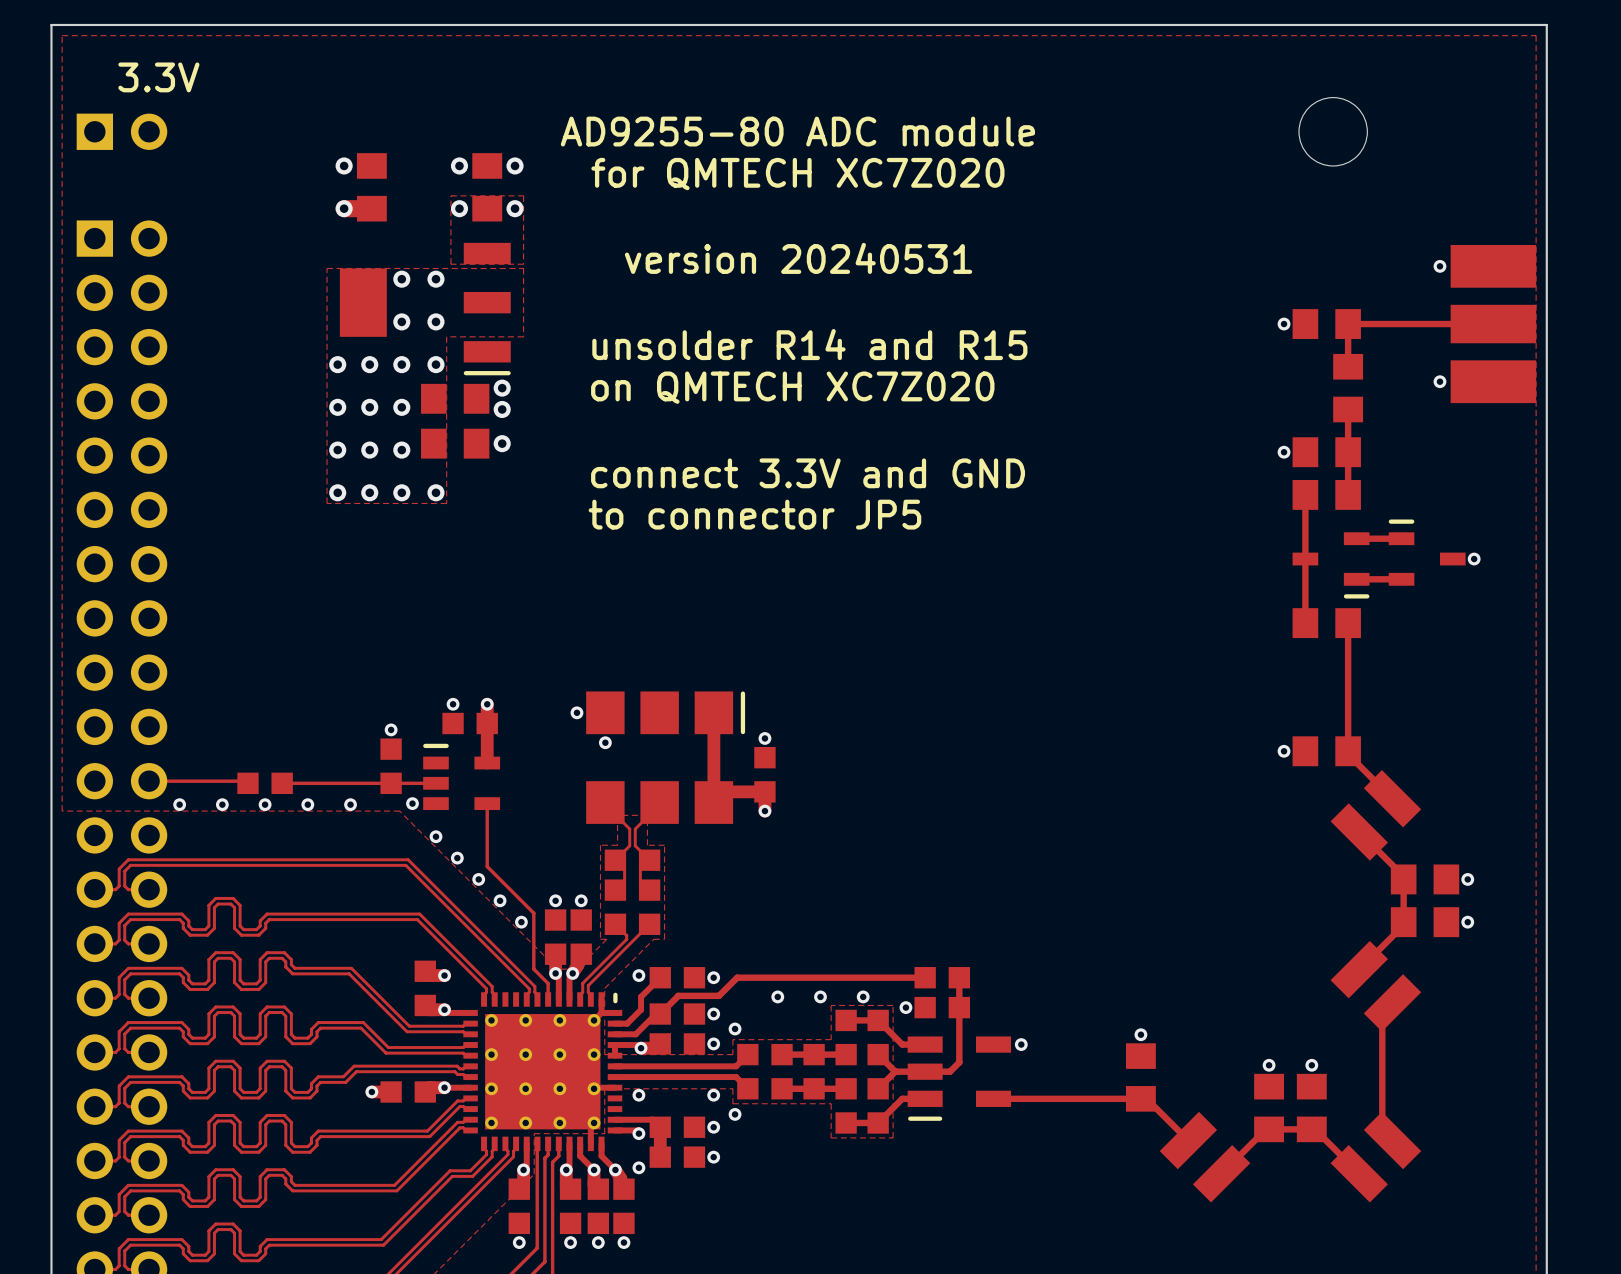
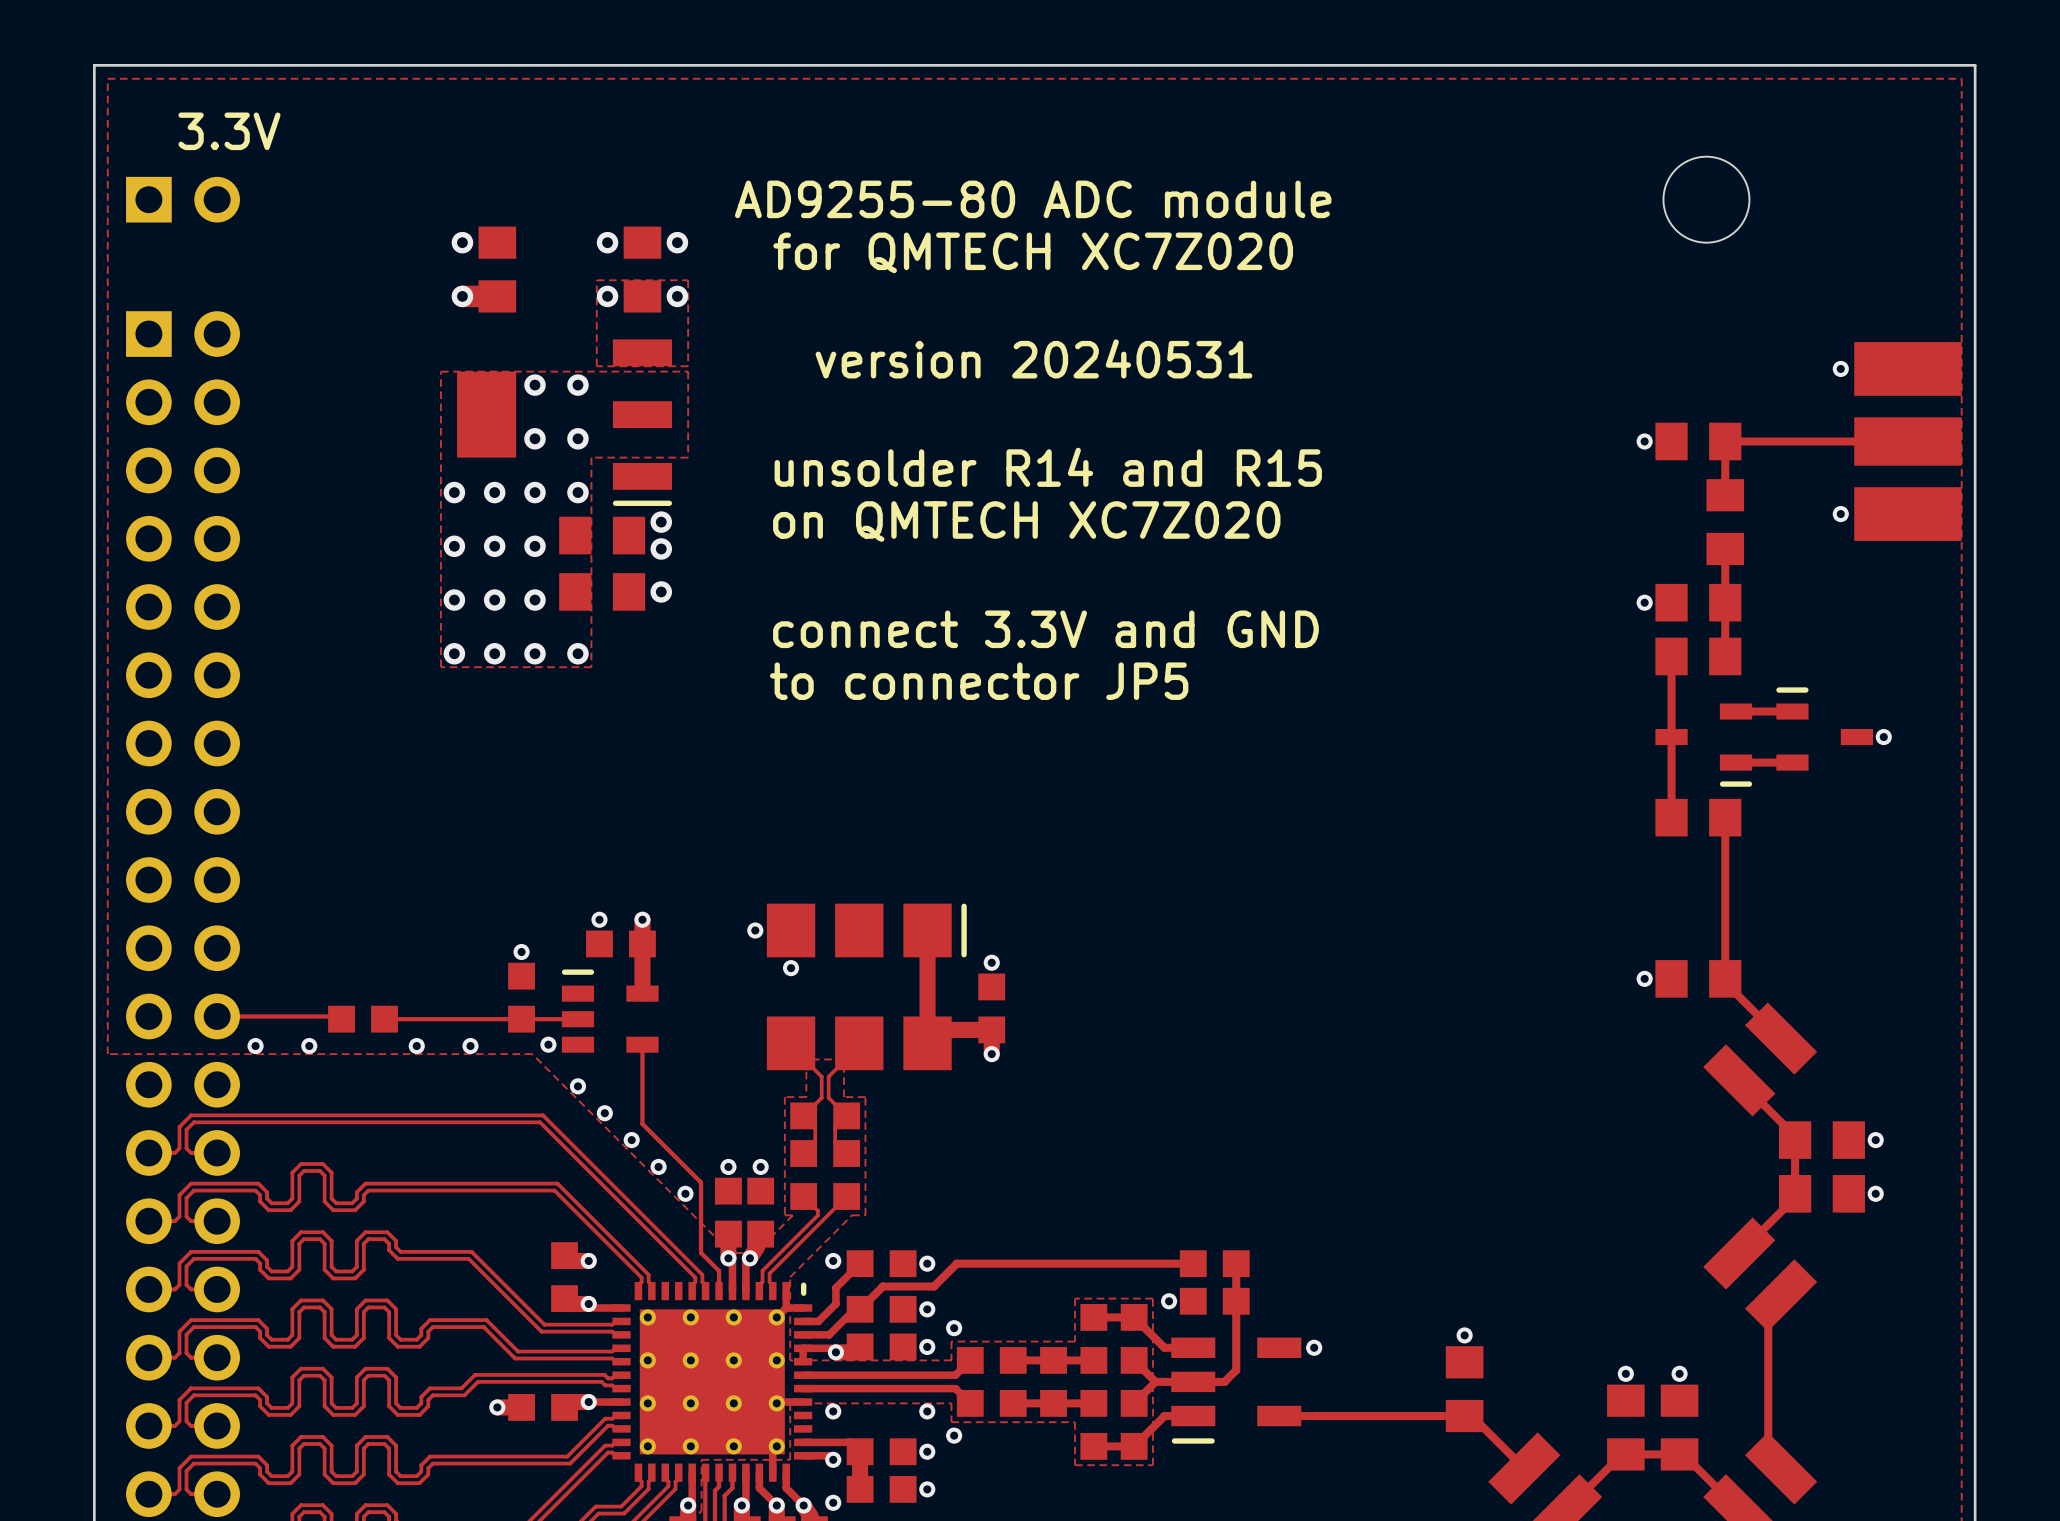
via: (265, 804) -> none
via: (777, 996) -> none
via: (820, 996) -> none
via: (863, 996) -> none

